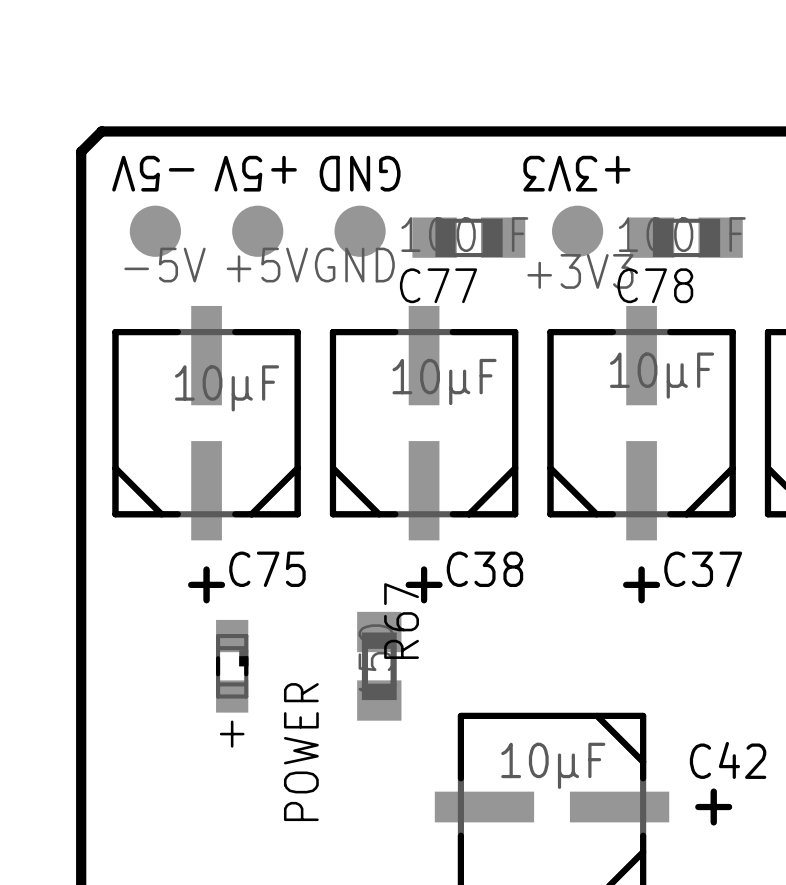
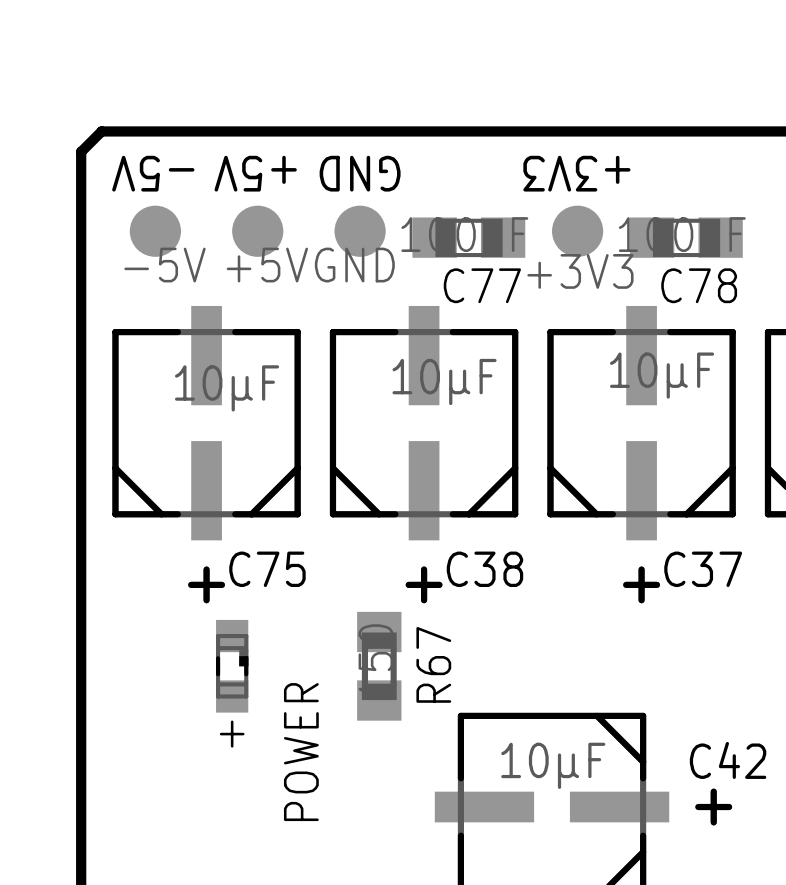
C77 name position: C77 (438, 285) -> C77 (482, 285)
C78 name position: C78 (655, 285) -> C78 (699, 285)
R67 name position: R67 (401, 621) -> R67 (433, 664)

